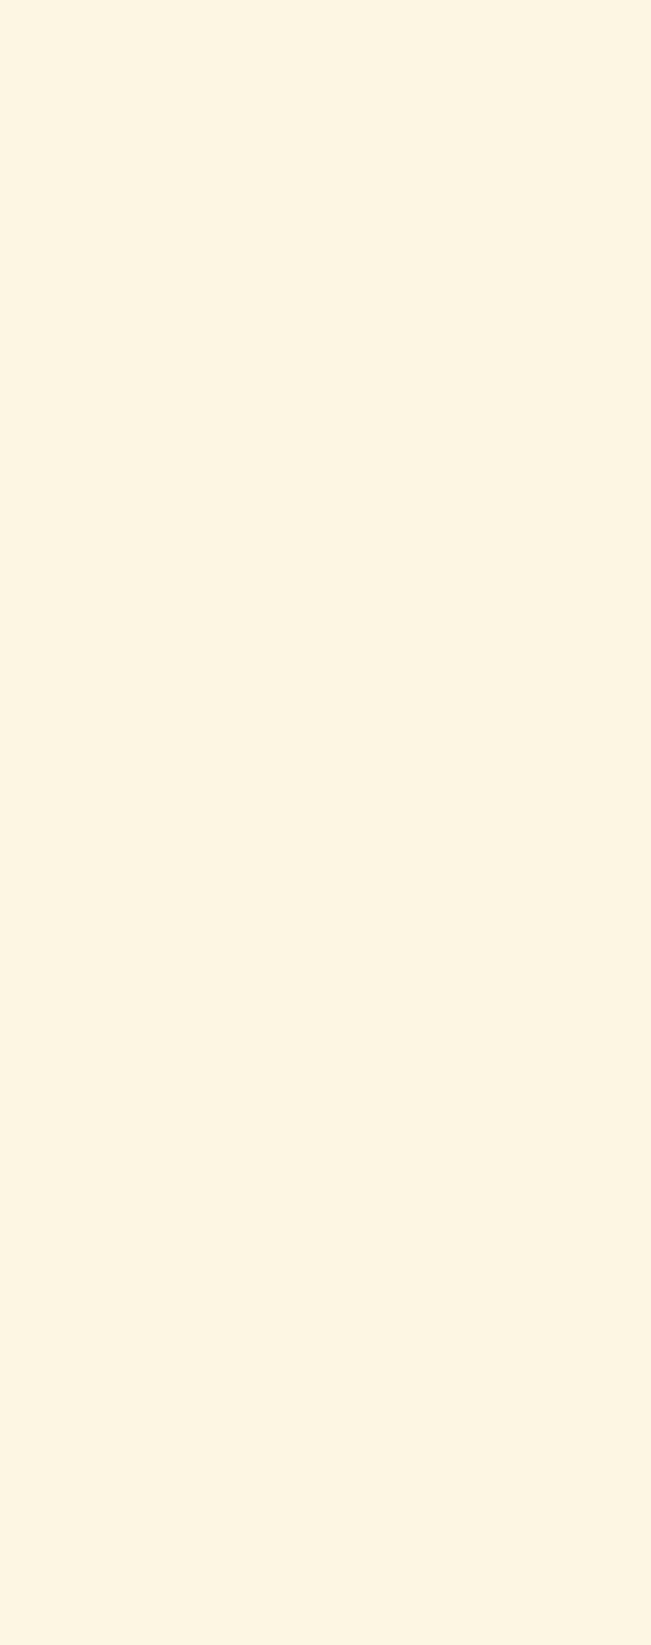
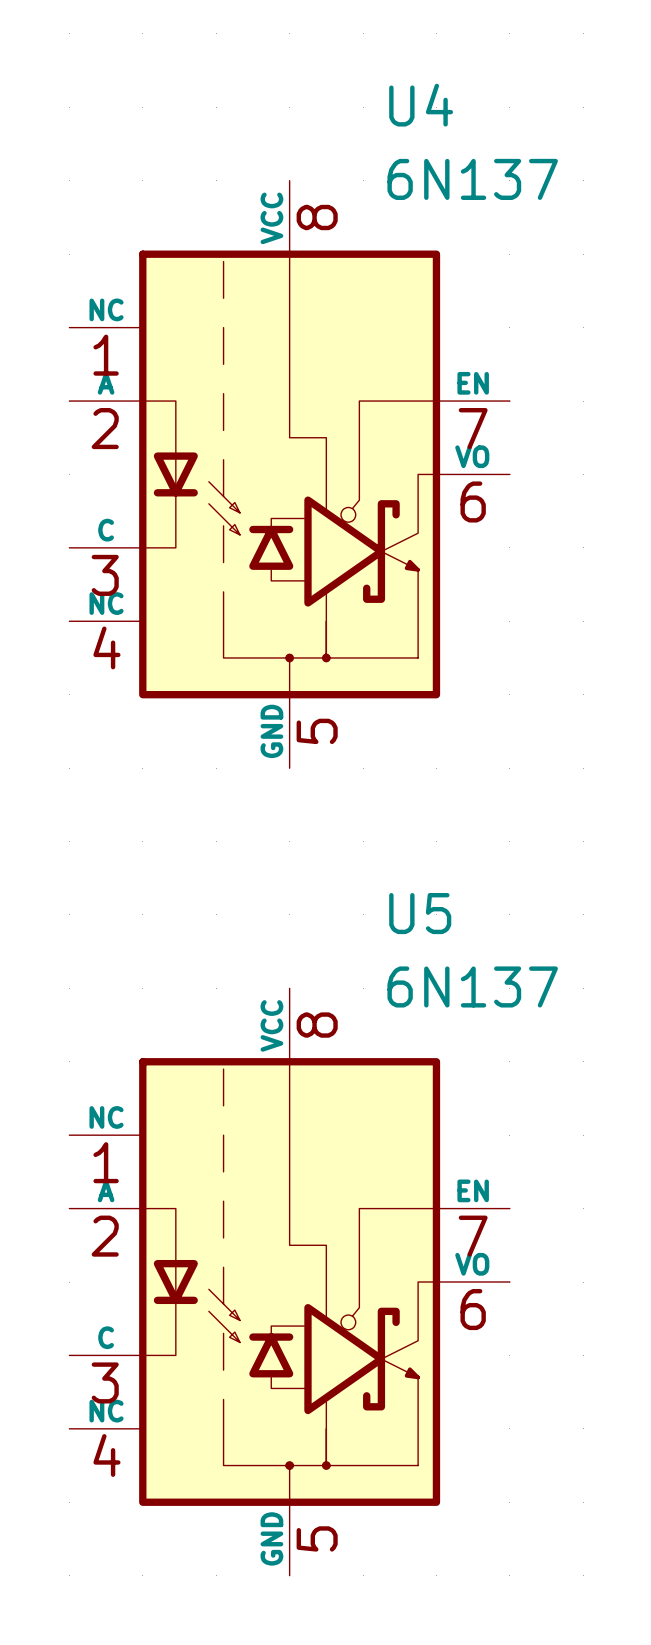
U4: none -> 6N137 (289, 474)
U5: none -> 6N137 (289, 1282)

